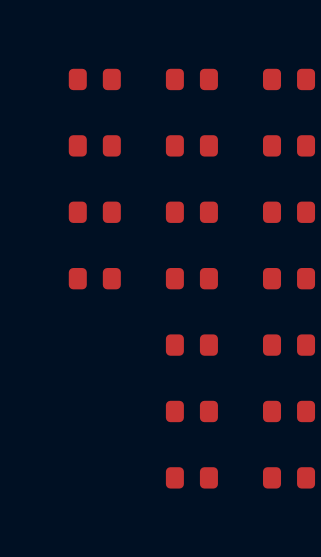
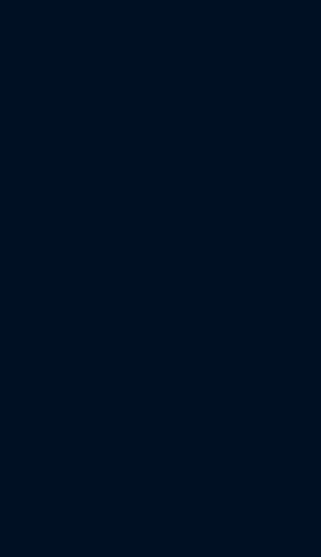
part: (94, 79) -> none
part: (191, 79) -> none
part: (289, 79) -> none
part: (94, 145) -> none
part: (191, 145) -> none
part: (289, 145) -> none
part: (94, 212) -> none
part: (191, 212) -> none
part: (289, 212) -> none
part: (94, 278) -> none
part: (191, 278) -> none
part: (289, 278) -> none
part: (191, 345) -> none
part: (289, 345) -> none
part: (191, 411) -> none
part: (289, 411) -> none
part: (191, 477) -> none
part: (289, 477) -> none

